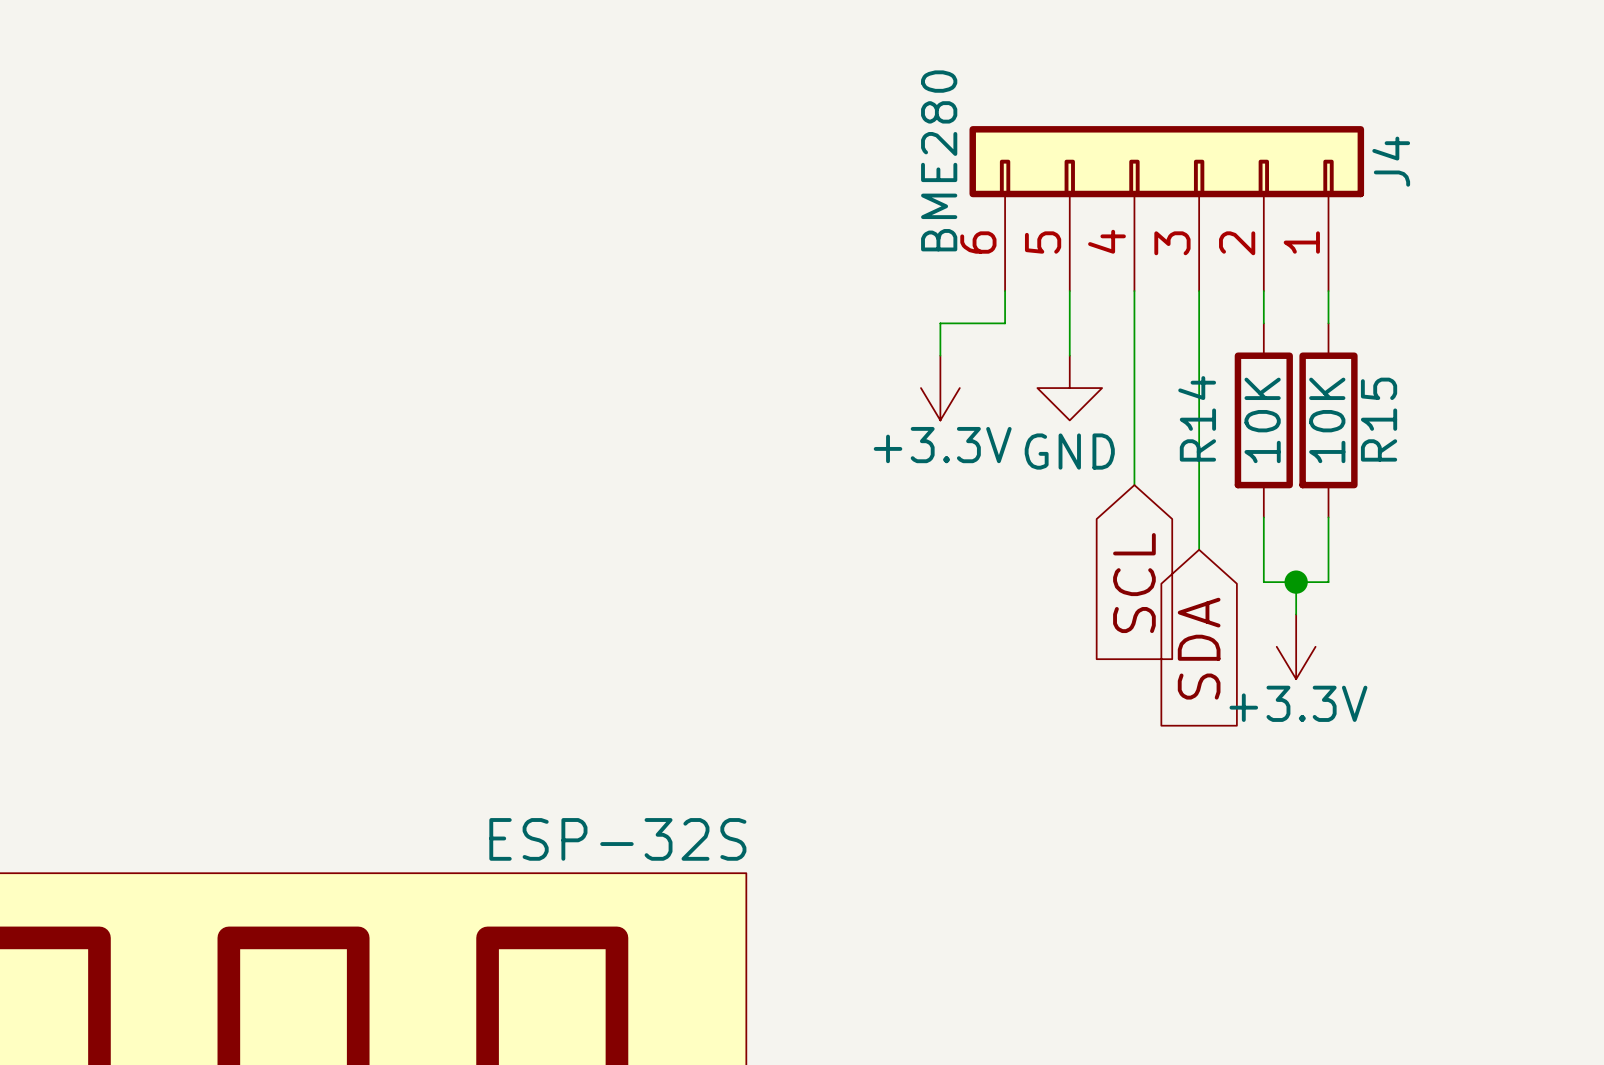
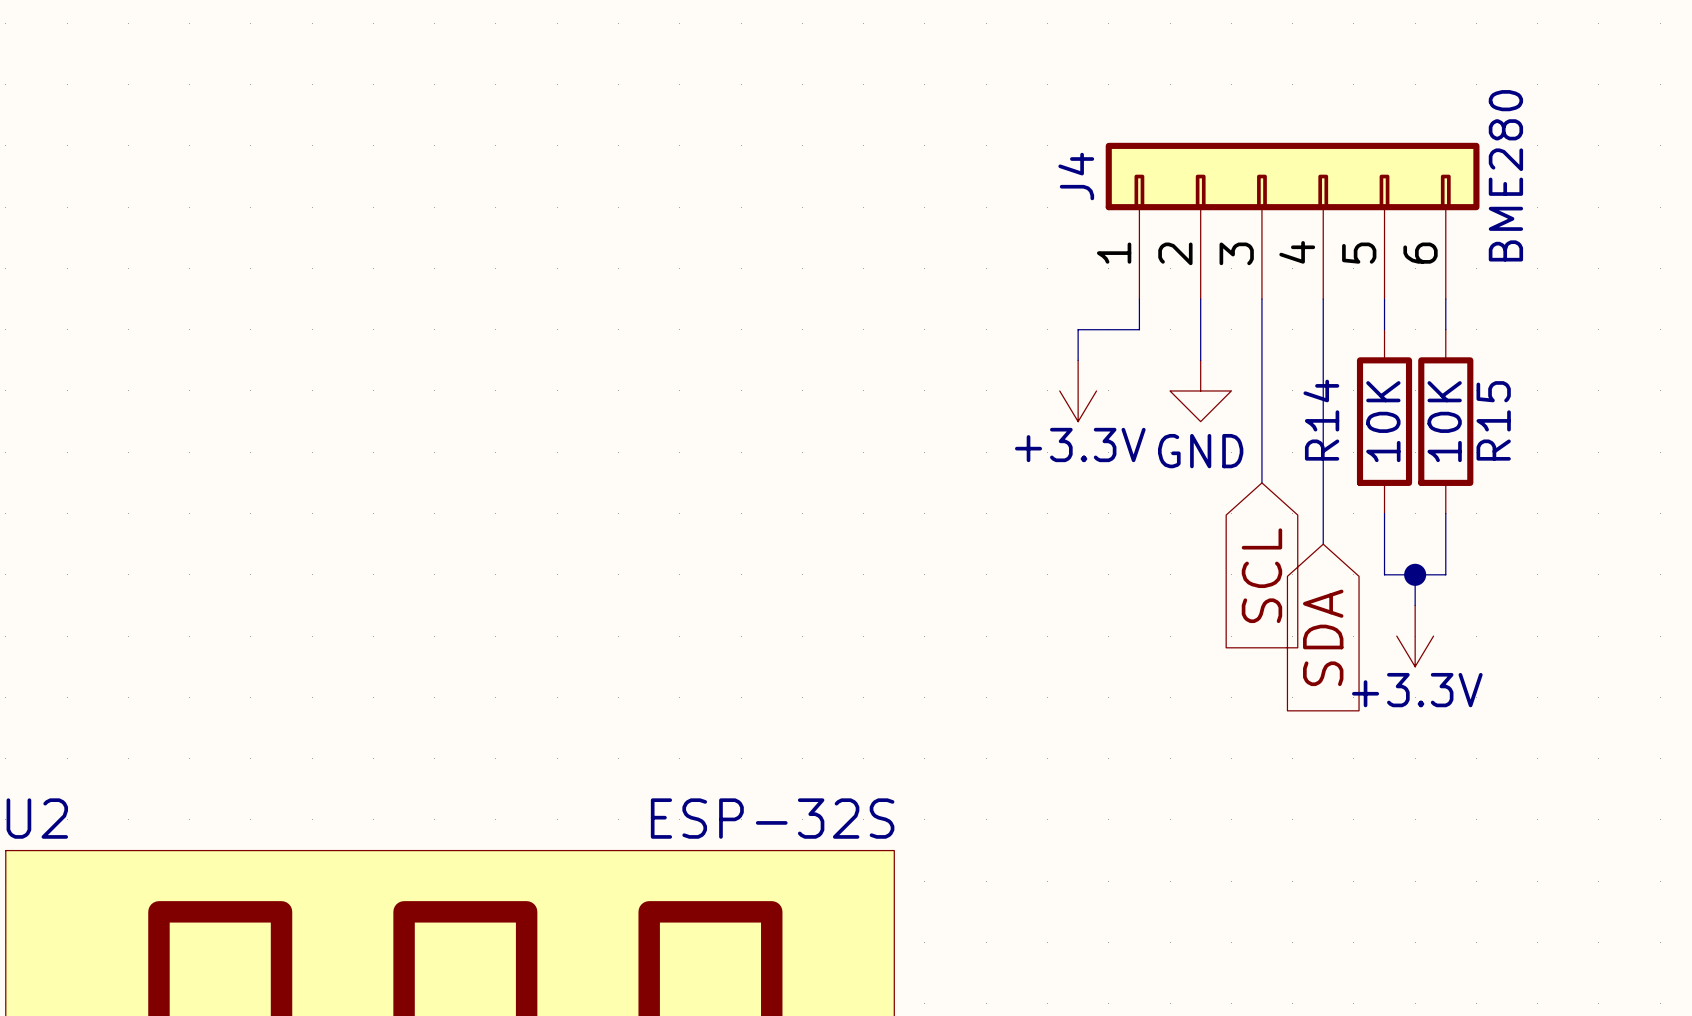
J4 flip: as is (1166, 161) -> left-right (1292, 176)

